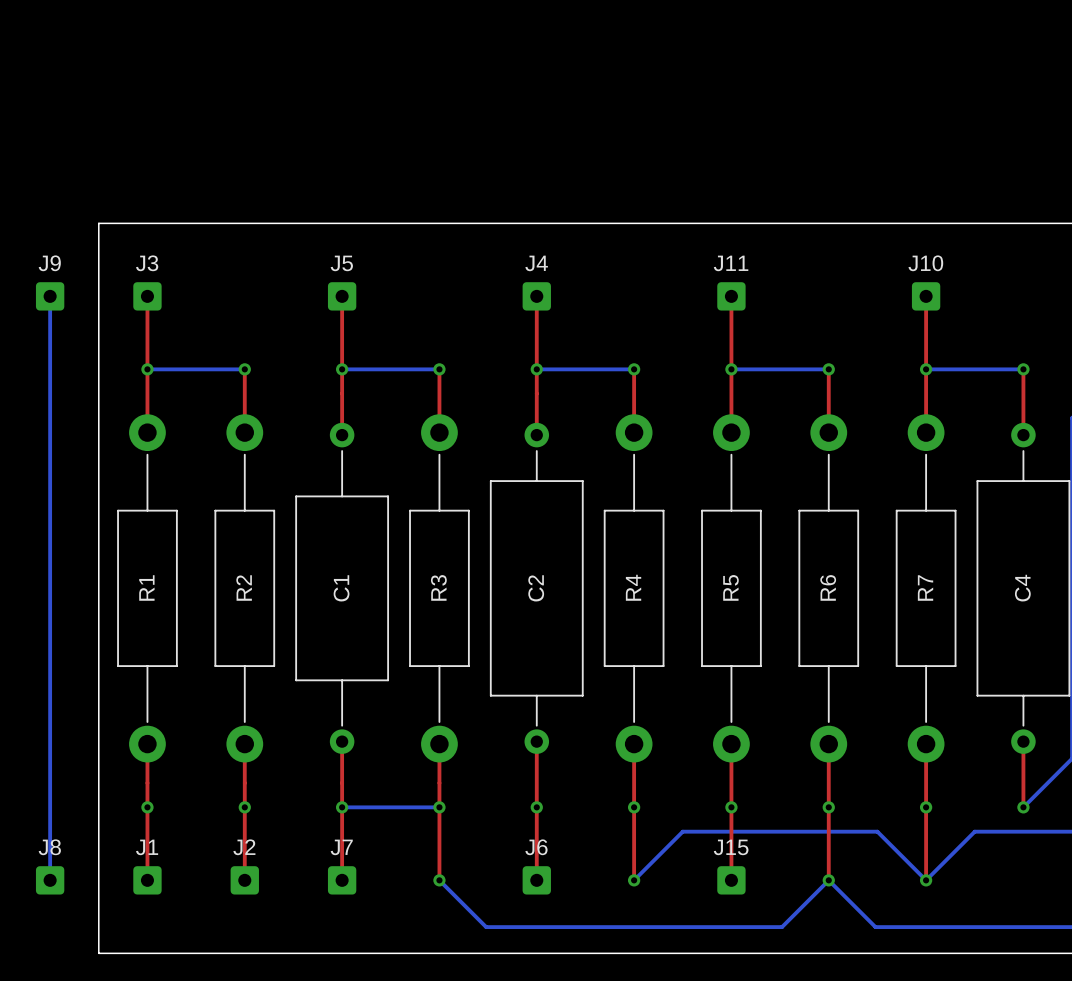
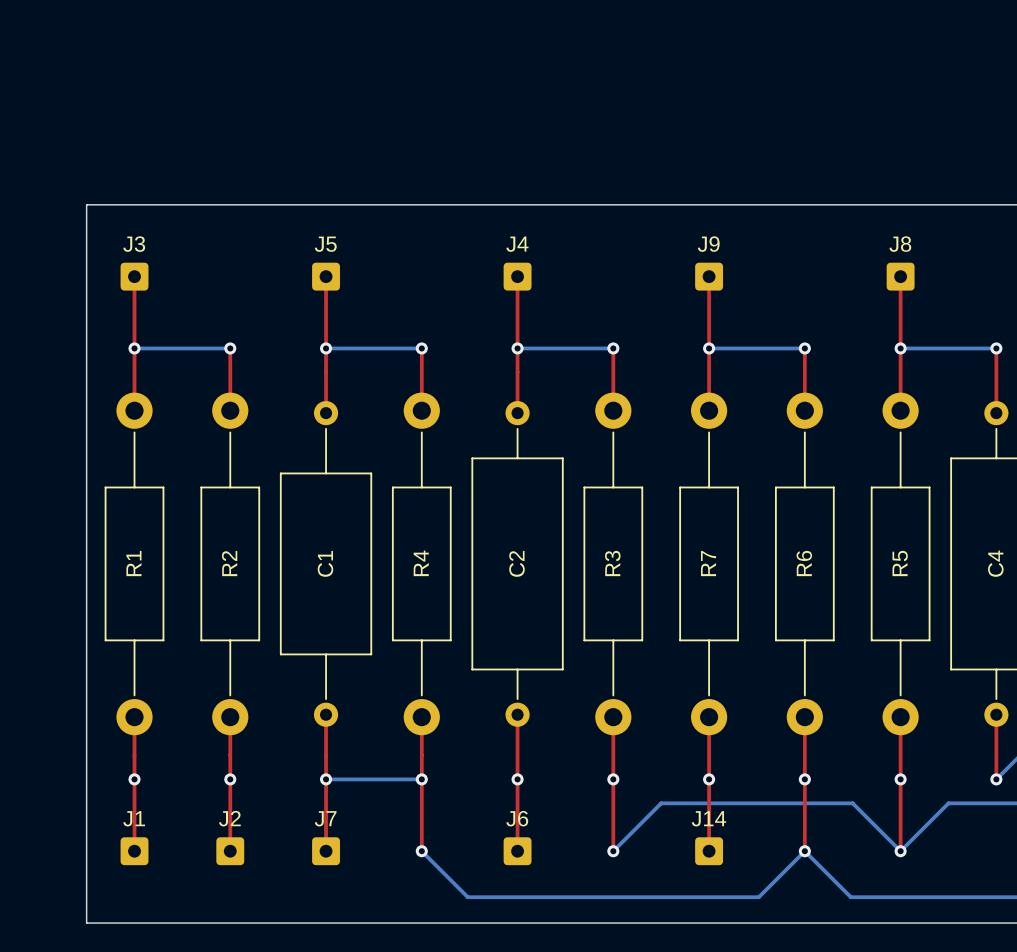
J11 name: J11 (731, 263) -> J9 (708, 244)
J10 name: J10 (925, 263) -> J8 (900, 244)
bottom track: (50, 296) (50, 880) -> none
J9: (50, 296) -> none
R3 name: R3 (438, 587) -> R4 (421, 563)
R4 name: R4 (633, 587) -> R3 (612, 563)
R5 name: R5 (730, 587) -> R7 (708, 563)
R7 name: R7 (925, 588) -> R5 (900, 563)
J15 name: J15 (731, 847) -> J14 (708, 818)
J8: (50, 880) -> none

